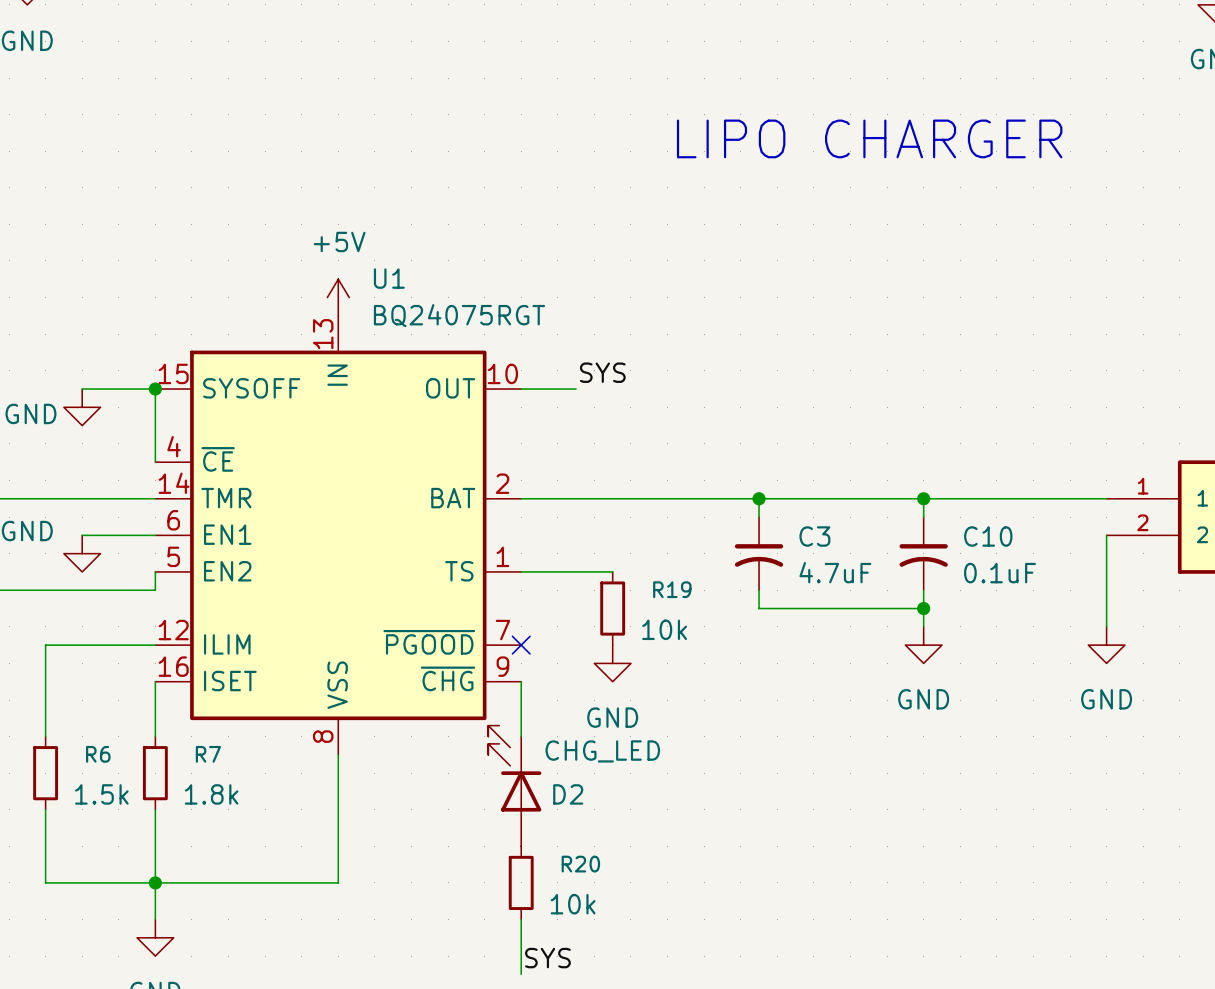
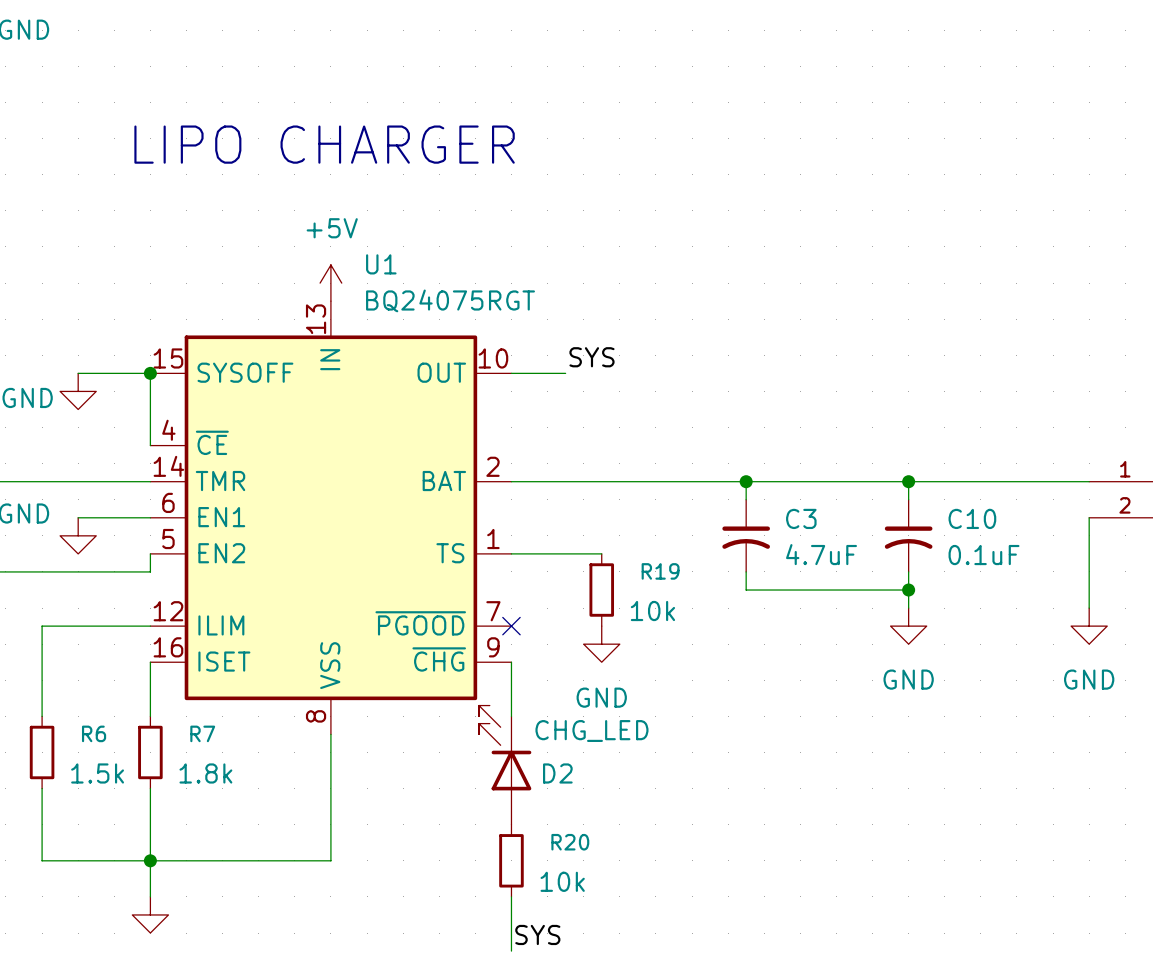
text: LIPO CHARGER (869, 138) -> none
text: none -> LIPO CHARGER (324, 144)

